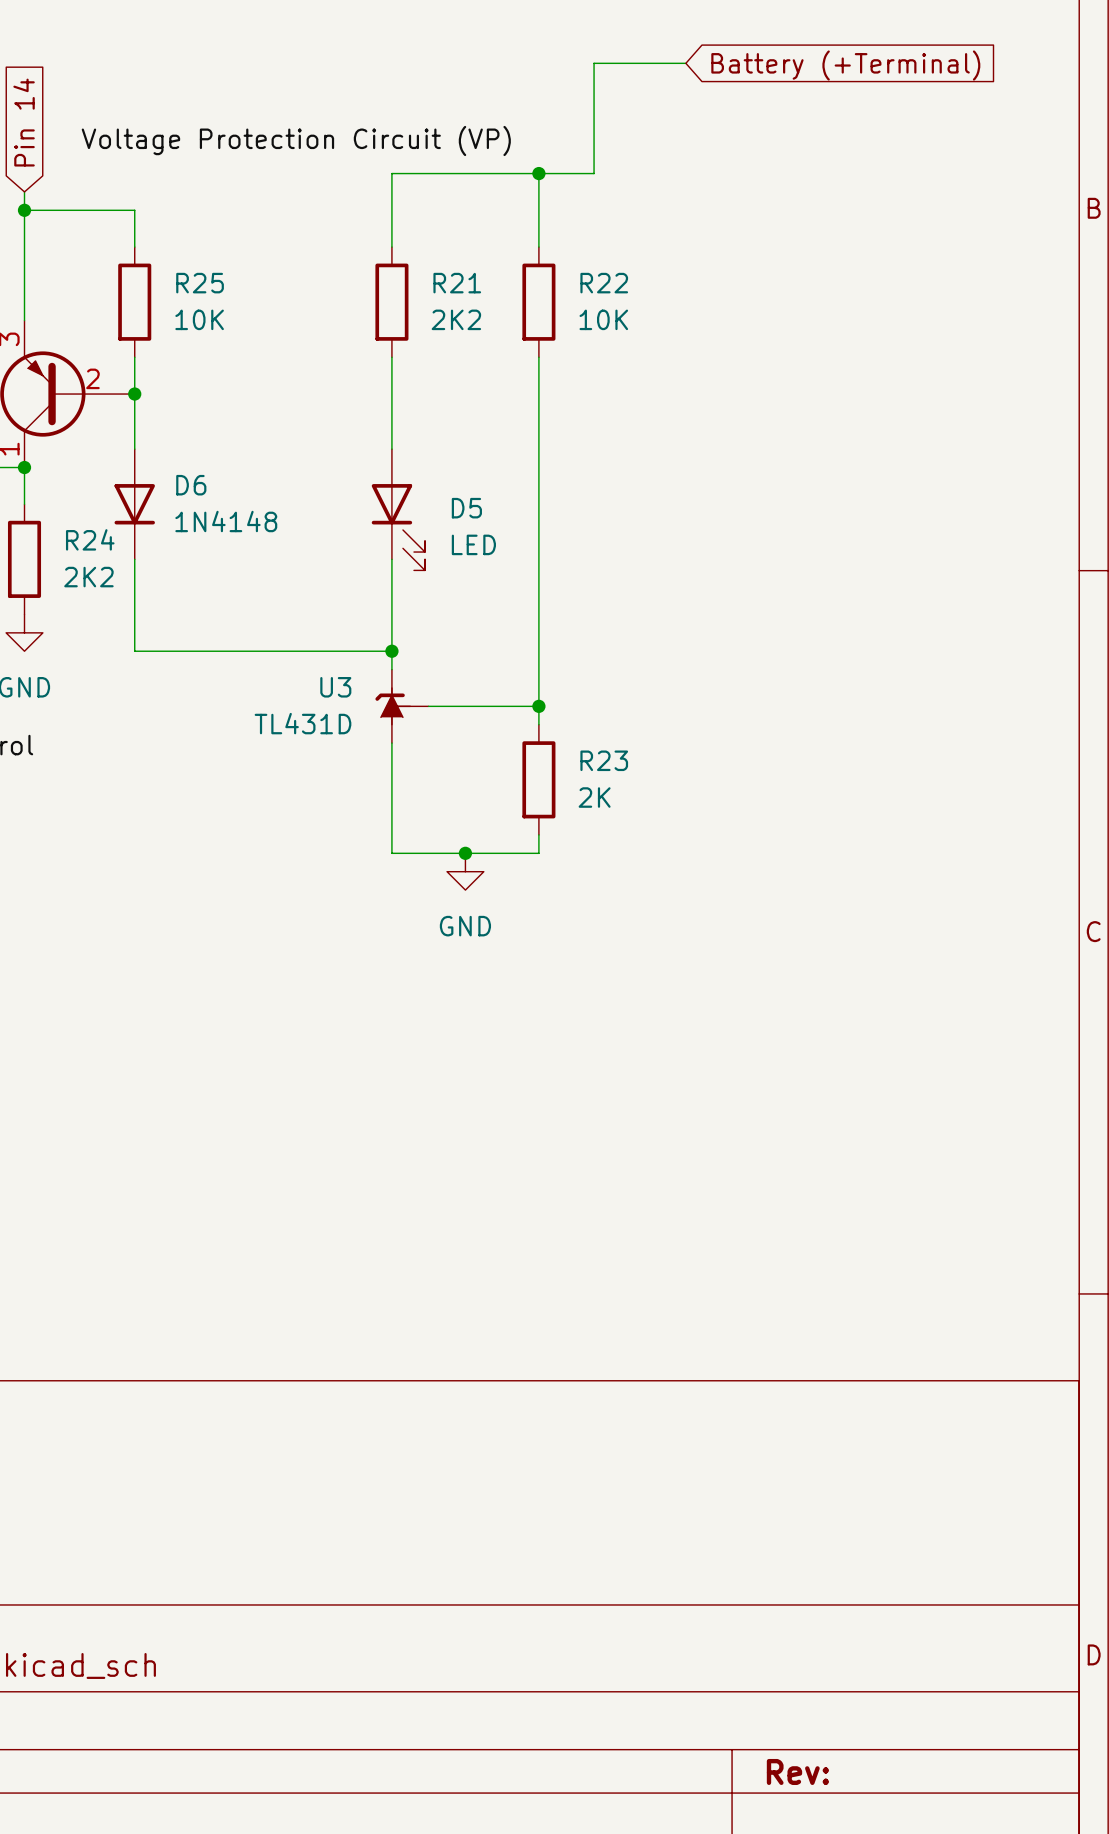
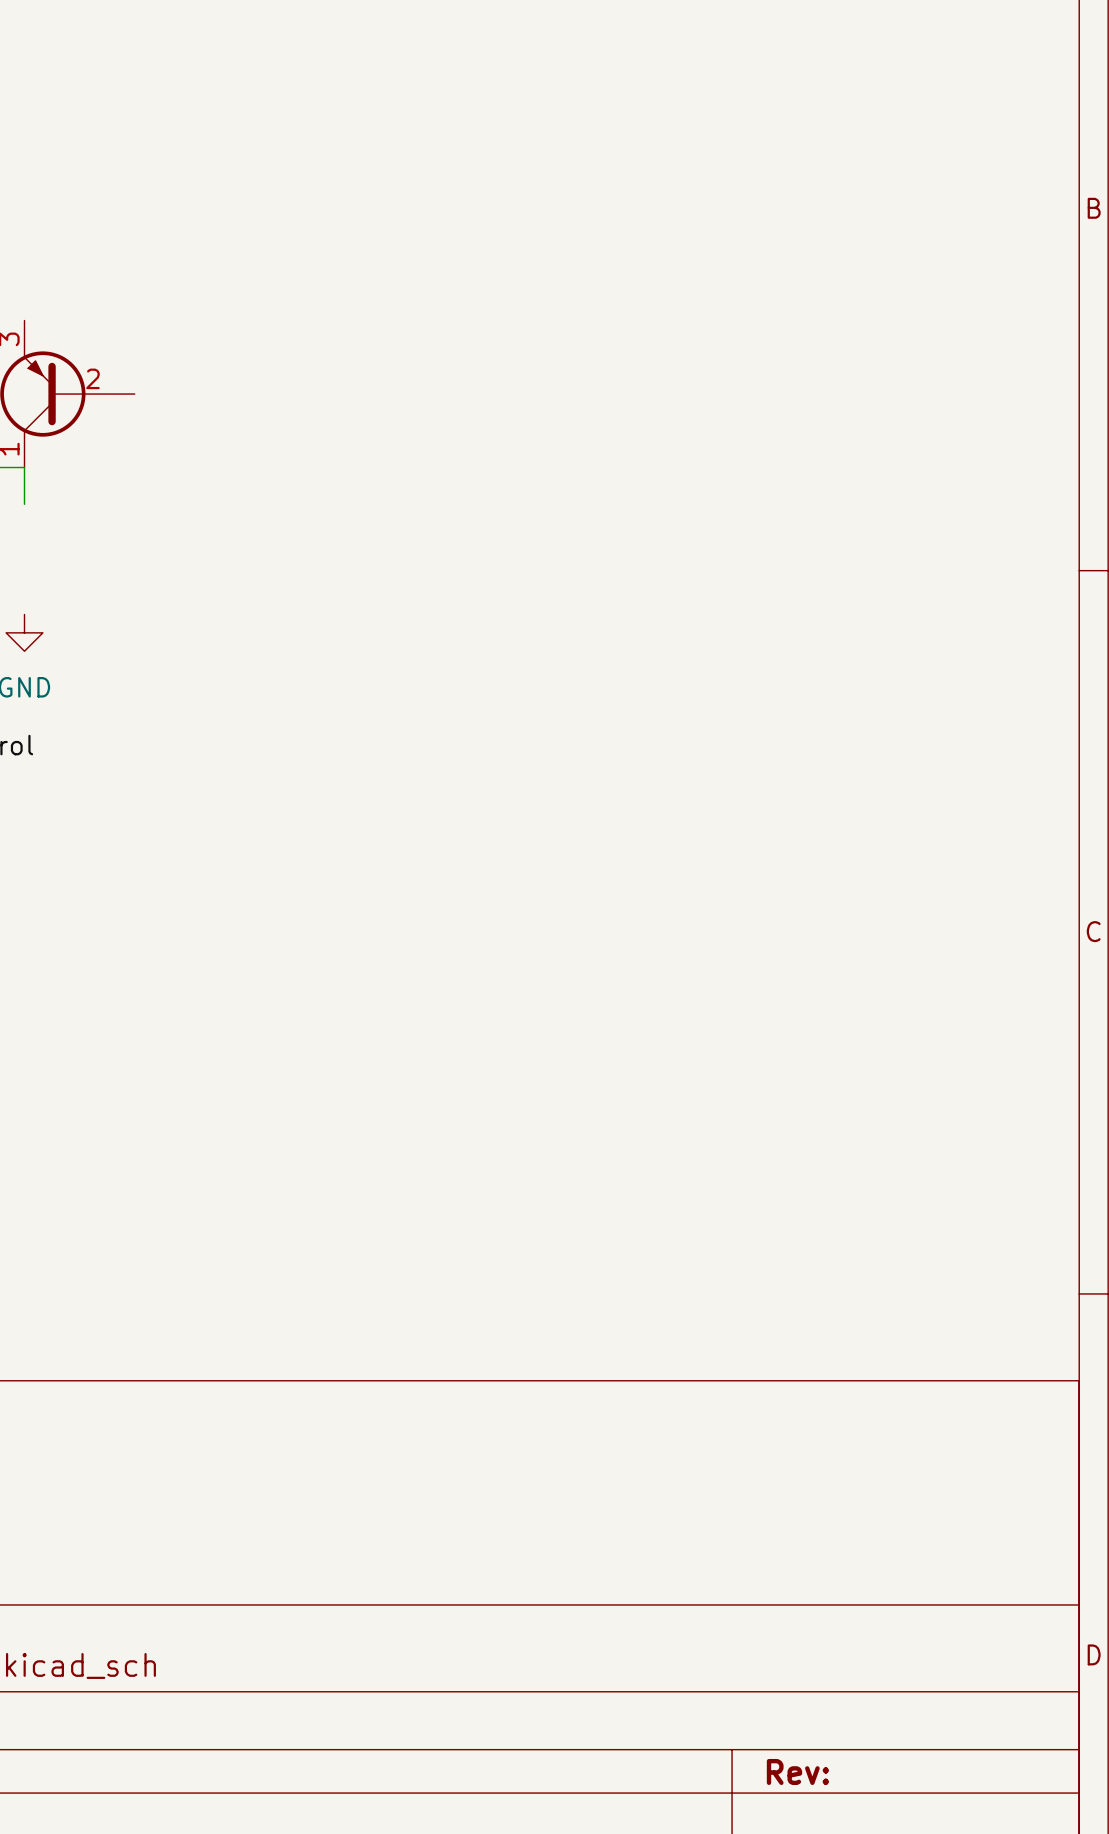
wire: (685, 63) (594, 63) (594, 173) (391, 173) (391, 247) -> none
global label: Battery (+Terminal) (845, 65) -> none
global label: Pin 14 (24, 122) -> none
label: Voltage Protection Circuit (VP) (296, 140) -> none
wire: (538, 173) (538, 247) -> none
junction: (538, 173) -> none
wire: (24, 191) (24, 320) -> none
wire: (24, 210) (134, 210) (134, 247) -> none
junction: (24, 210) -> none
R25: 10K (134, 302) -> none
R21: 2K2 (391, 302) -> none
R22: 10K (538, 302) -> none
wire: (134, 357) (134, 449) -> none
wire: (391, 357) (391, 449) -> none
wire: (538, 357) (538, 724) -> none
junction: (134, 394) -> none
junction: (24, 467) -> none
D6: 1N4148 (134, 504) -> none
D5: LED (398, 509) -> none
R24: 2K2 (24, 559) -> none
wire: (134, 559) (134, 651) (391, 651) -> none
wire: (391, 559) (391, 669) -> none
junction: (391, 651) -> none
U3: TL431D (402, 706) -> none
wire: (428, 706) (538, 706) -> none
junction: (538, 706) -> none
wire: (391, 743) (391, 853) (538, 853) (538, 834) -> none
R23: 2K (538, 779) -> none
junction: (465, 853) -> none
power symbol: GND (465, 871) -> none

